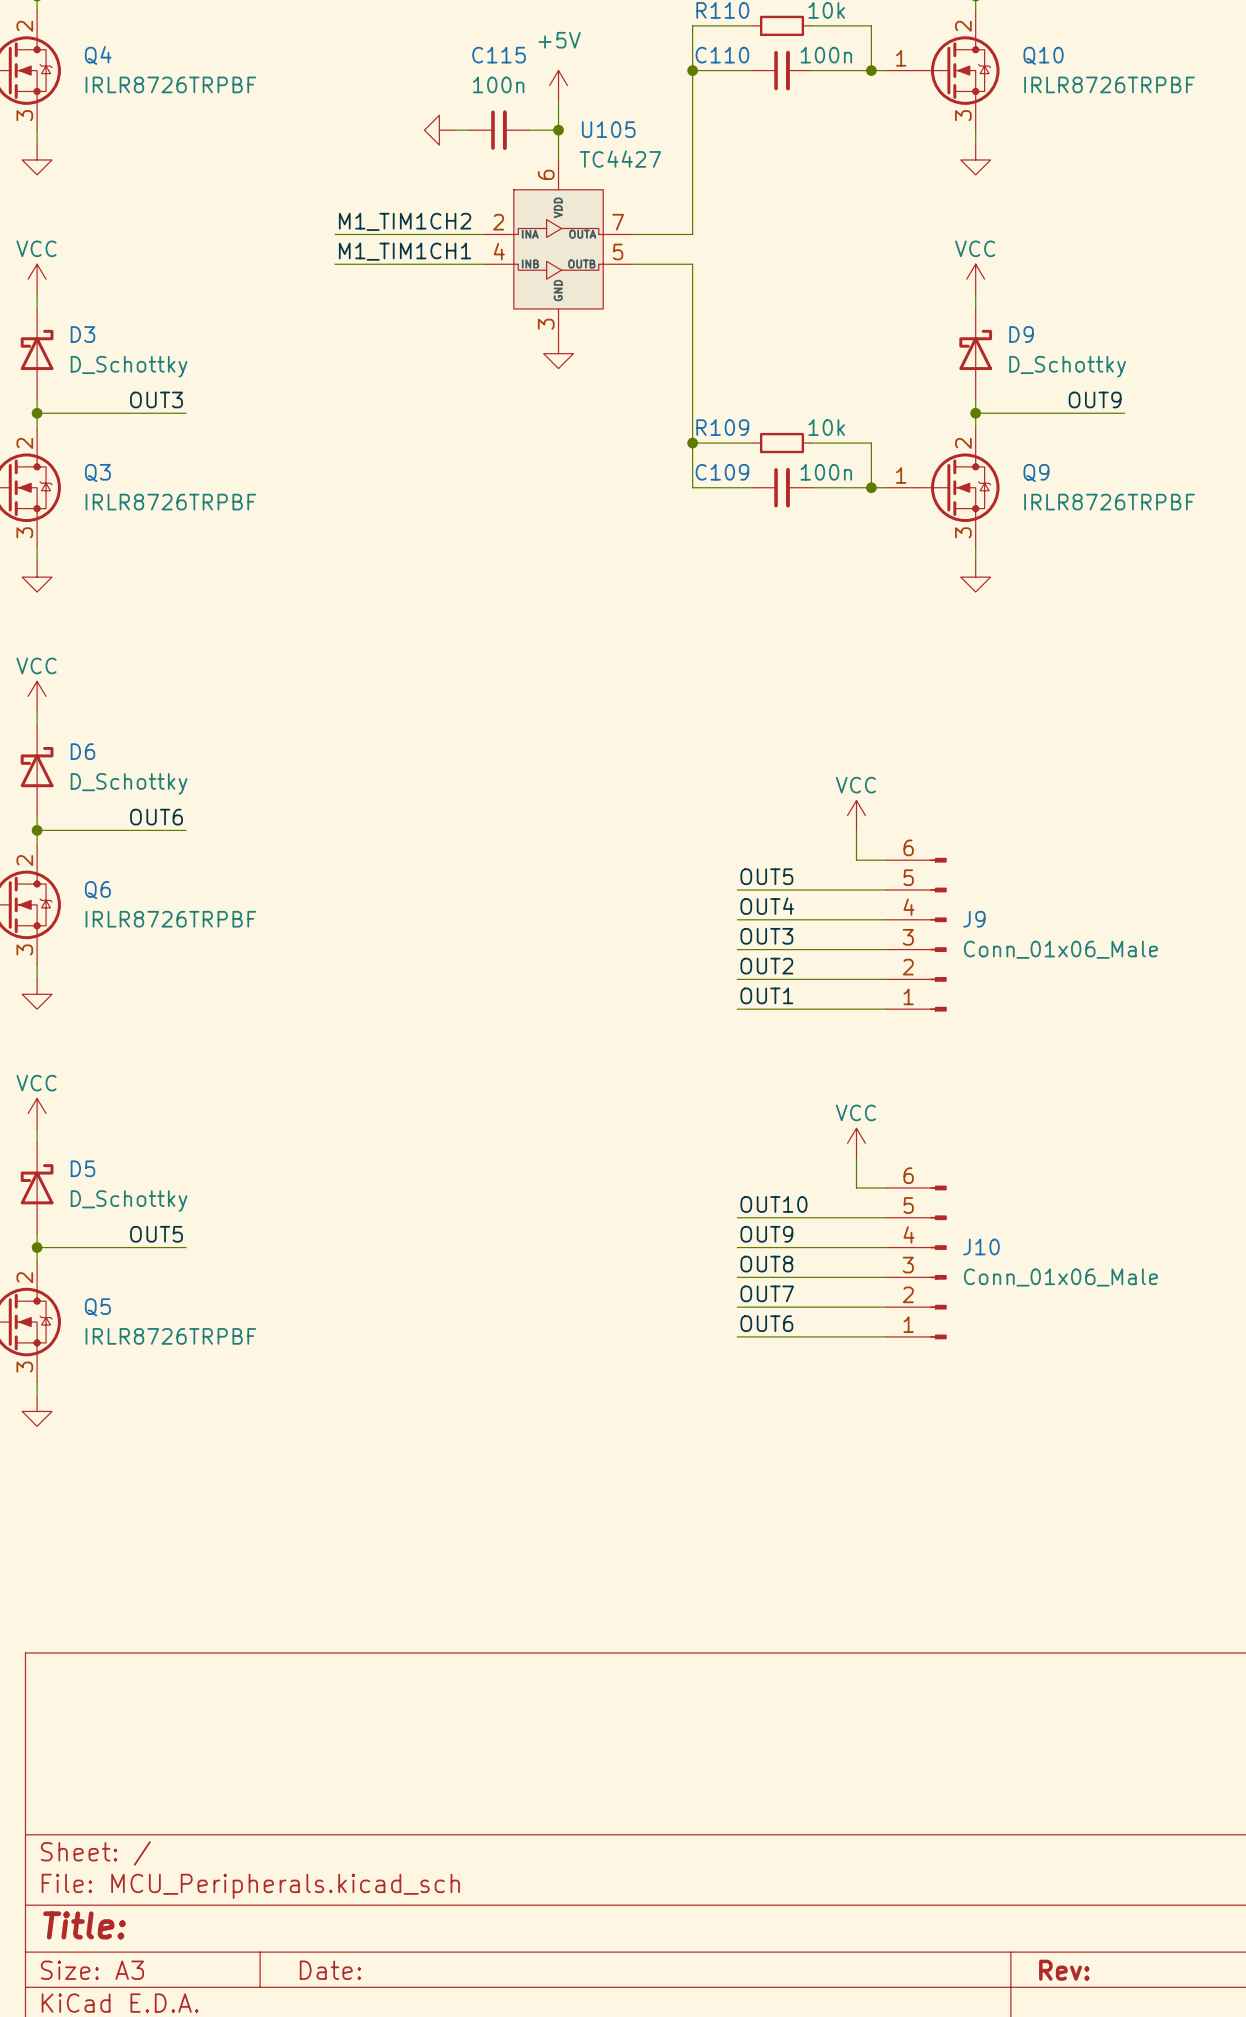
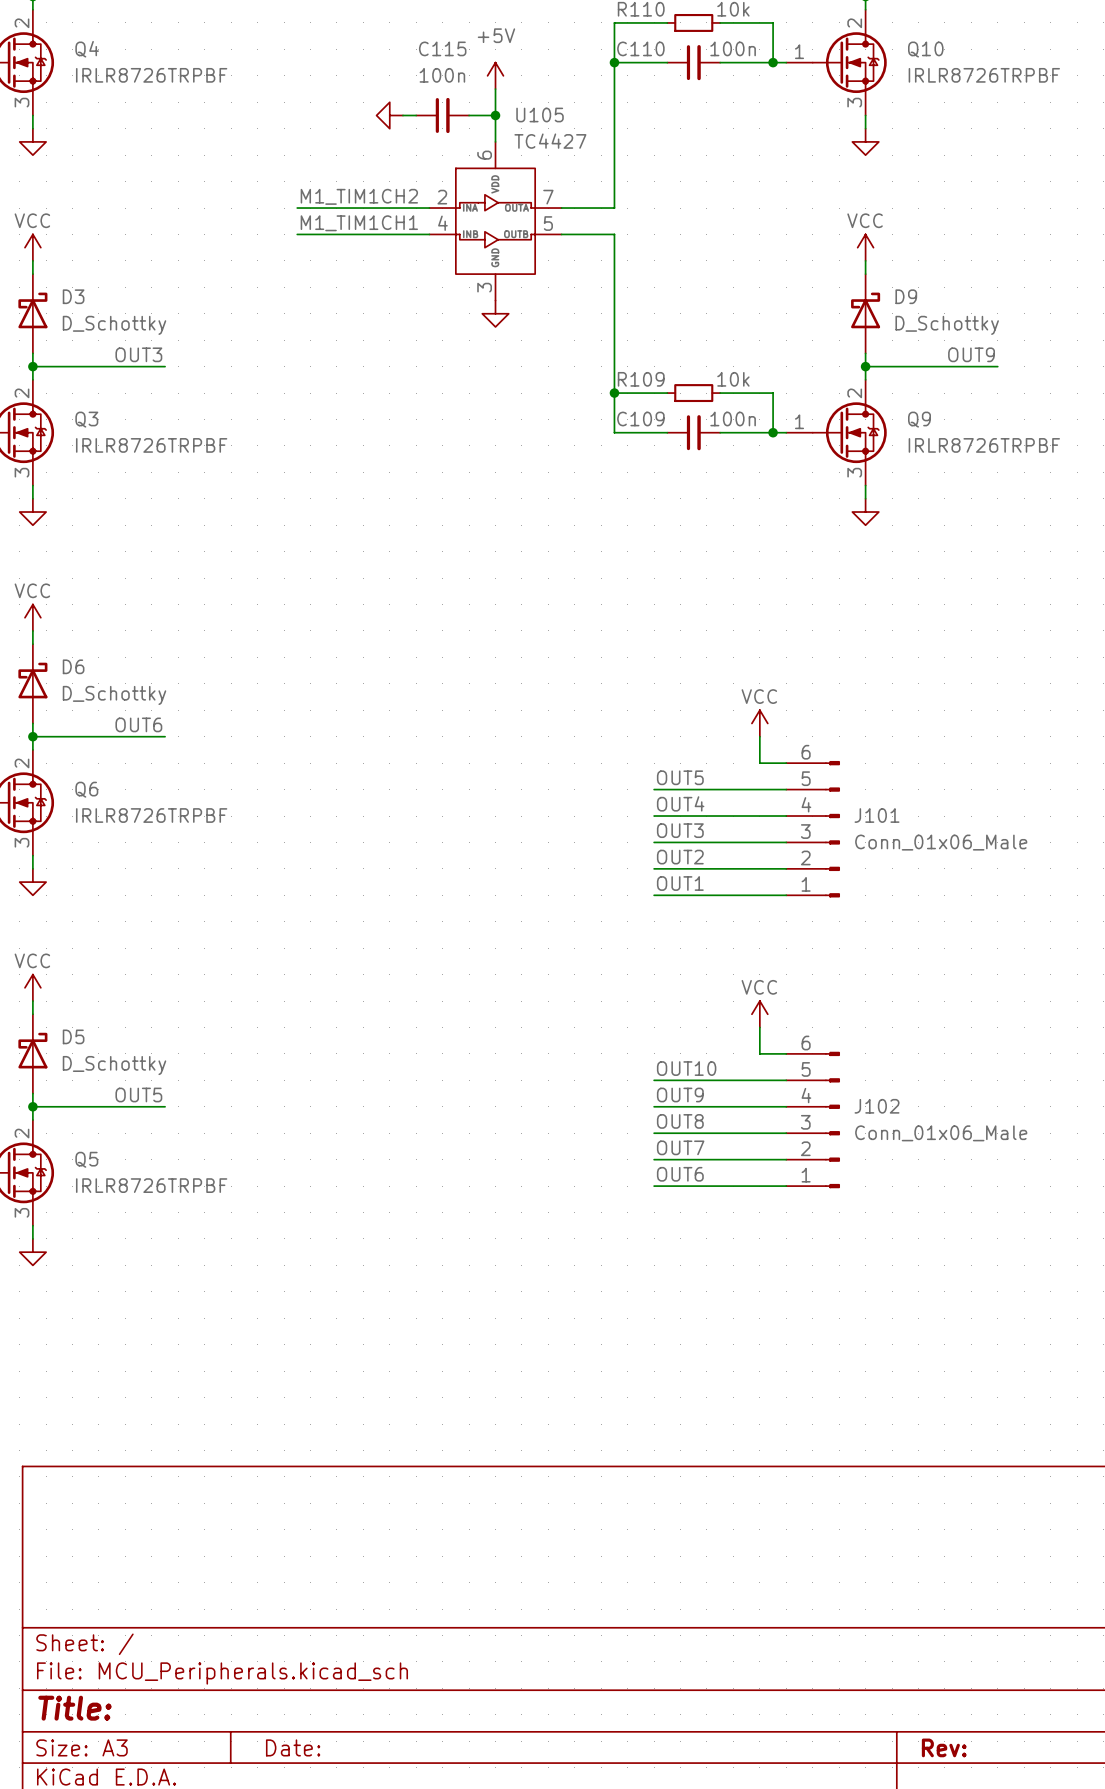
J9 name: J9 (974, 919) -> J101 (877, 815)
J10 name: J10 (981, 1247) -> J102 (877, 1106)

